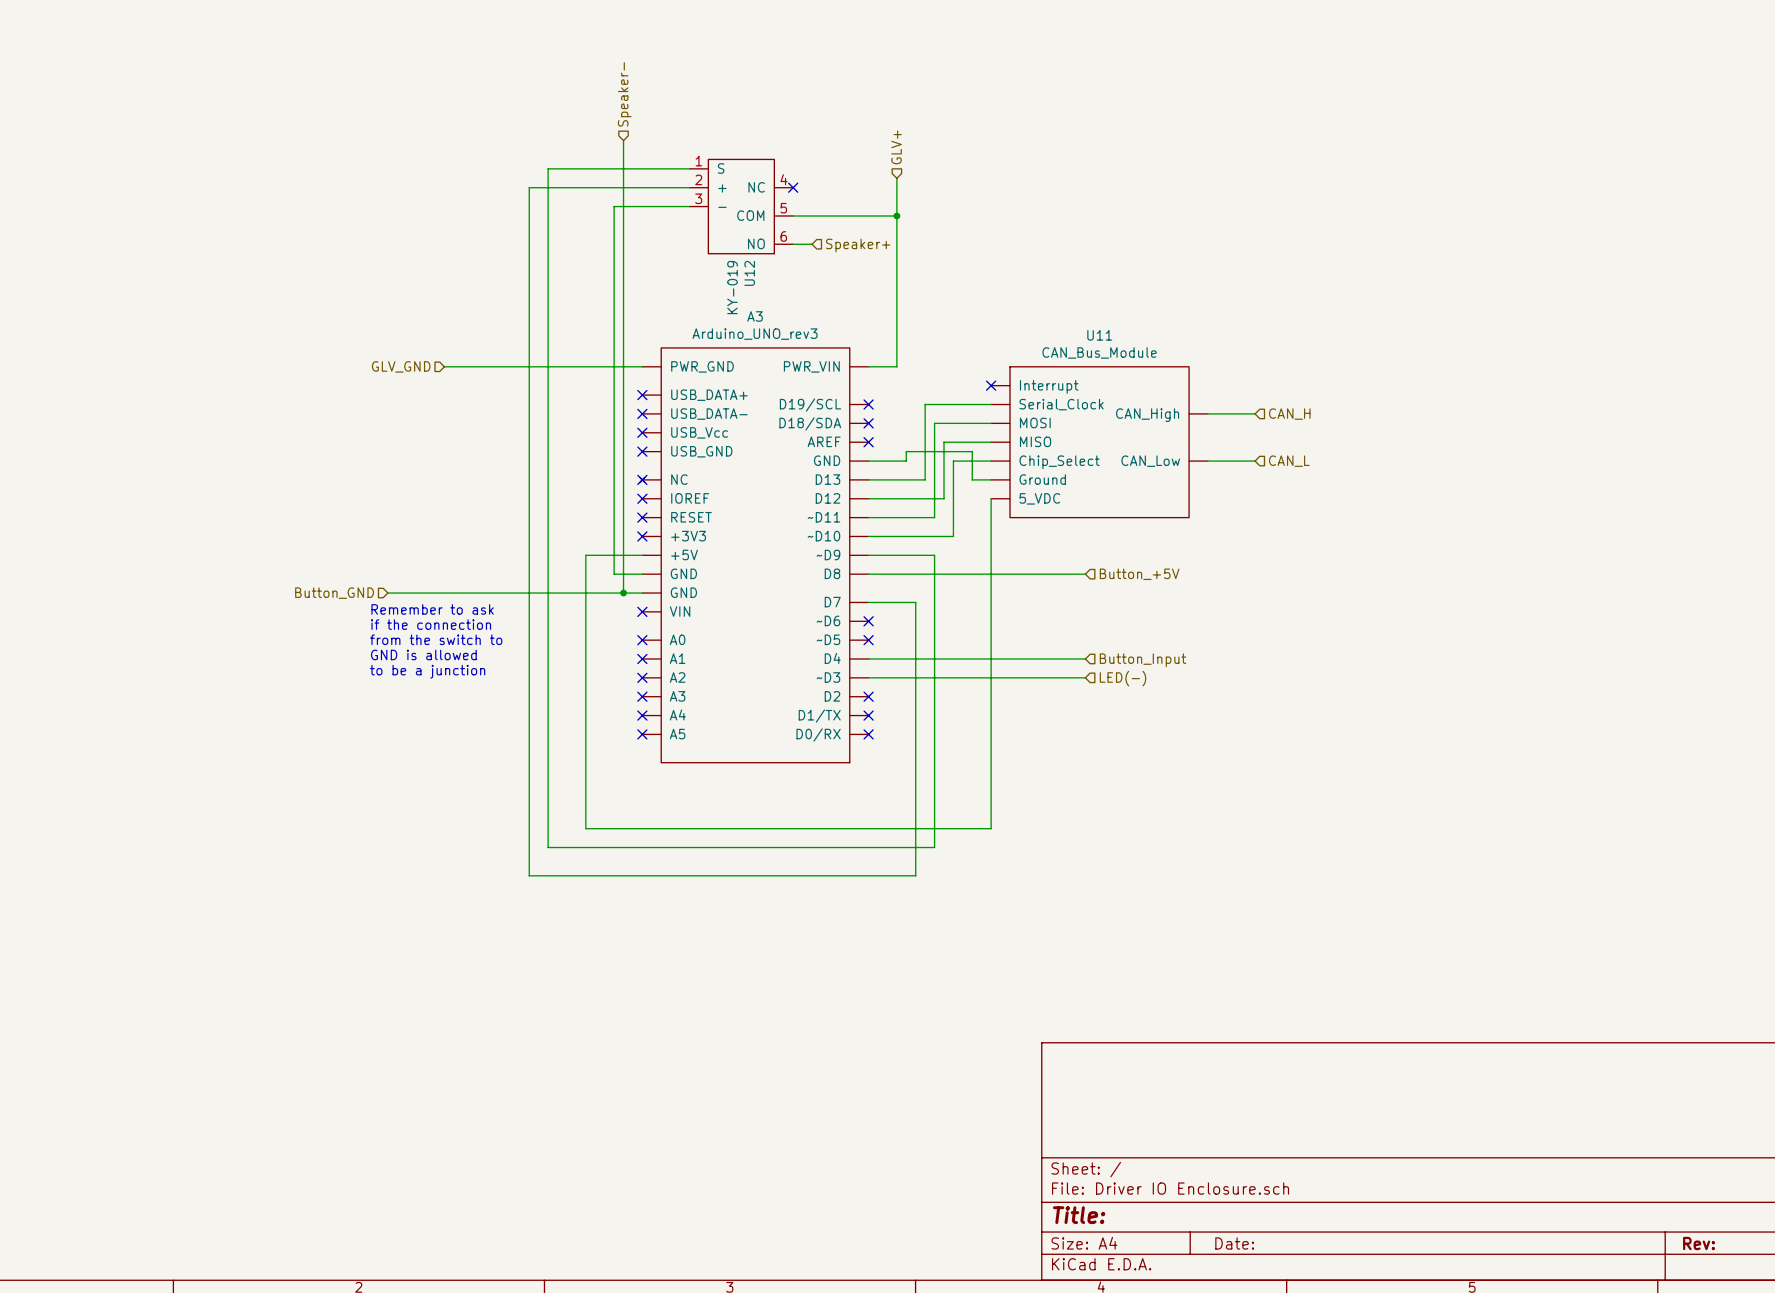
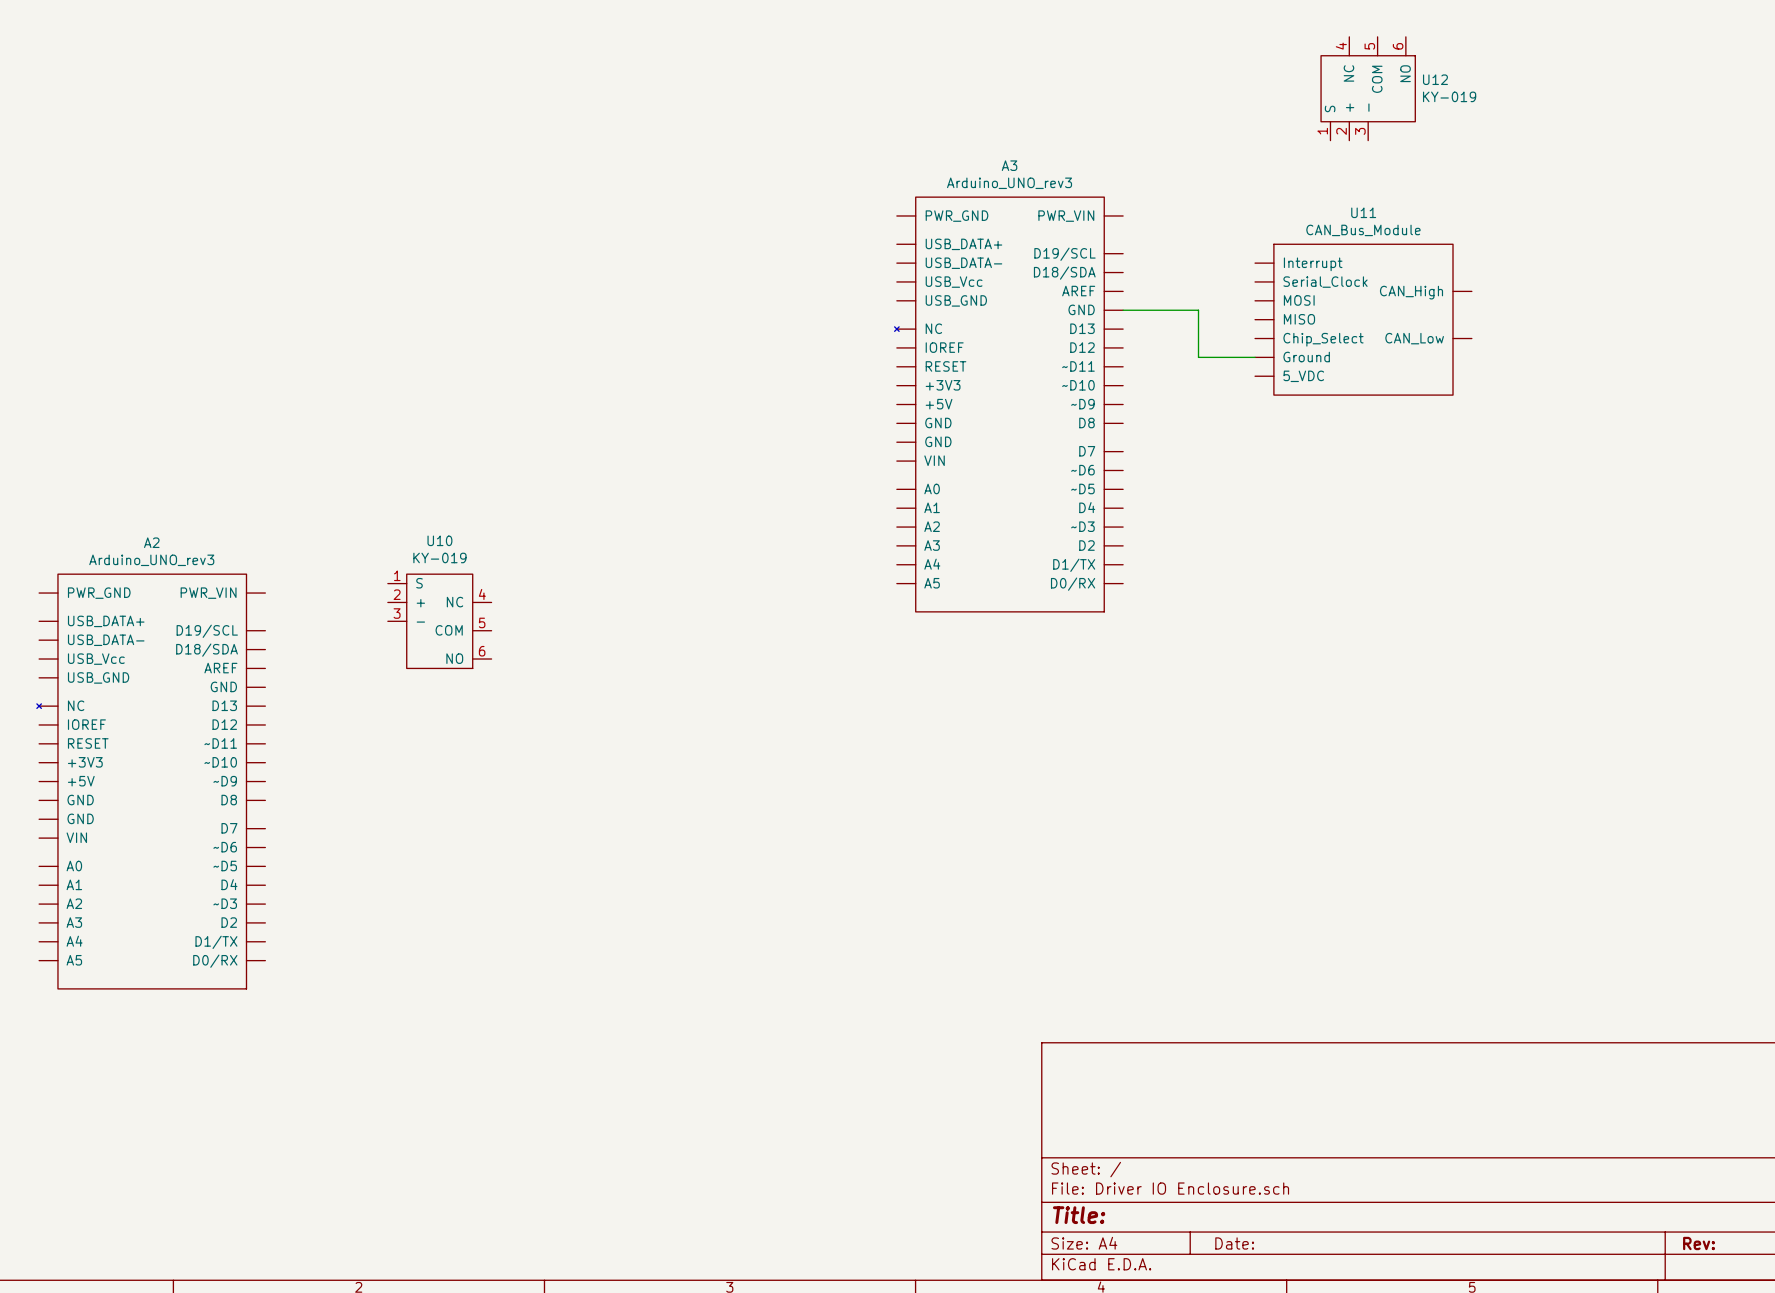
hierarchical label: Speaker- (624, 94) -> none
wire: (623, 140) (623, 593) -> none
hierarchical label: GLV+ (896, 147) -> none
wire: (689, 168) (548, 168) (548, 847) (934, 847) (934, 555) (868, 555) -> none
wire: (896, 178) (896, 366) (868, 366) -> none
wire: (689, 187) (529, 187) (529, 875) (915, 875) (915, 602) (868, 602) -> none
no-connect mark: (793, 187) -> none
wire: (689, 206) (614, 206) (614, 574) (642, 574) -> none
U12 rotation: 0° (741, 206) -> 90° counterclockwise (1368, 88)
U12 position: (741, 206) -> (1368, 88)
wire: (793, 215) (896, 215) -> none
junction: (896, 215) -> none
wire: (793, 244) (812, 244) -> none
hierarchical label: Speaker+ (858, 245) -> none
wire: none -> (1123, 310) (1198, 310) (1198, 357) (1255, 357)
hierarchical label: GLV_GND (401, 366) -> none
wire: (444, 366) (642, 366) -> none
no-connect mark: (991, 385) -> none
no-connect mark: (642, 395) -> none
no-connect mark: (868, 404) -> none
wire: (991, 404) (925, 404) (925, 479) (868, 479) -> none
no-connect mark: (642, 413) -> none
wire: (1207, 413) (1255, 413) -> none
hierarchical label: CAN_H (1289, 414) -> none
no-connect mark: (868, 423) -> none
wire: (991, 423) (934, 423) (934, 517) (868, 517) -> none
no-connect mark: (642, 432) -> none
no-connect mark: (868, 442) -> none
wire: (991, 442) (944, 442) (944, 498) (868, 498) -> none
U11 position: (1099, 442) -> (1363, 319)
no-connect mark: (642, 451) -> none
wire: (868, 461) (906, 461) (906, 451) (972, 451) (972, 479) (991, 479) -> none
wire: (991, 461) (953, 461) (953, 536) (868, 536) -> none
wire: (1207, 461) (1255, 461) -> none
hierarchical label: CAN_L (1289, 461) -> none
no-connect mark: (642, 479) -> none
no-connect mark: (642, 498) -> none
wire: (991, 498) (991, 828) (585, 828) (585, 555) (642, 555) -> none
no-connect mark: (642, 517) -> none
no-connect mark: (642, 536) -> none
A3 position: (754, 555) -> (1008, 404)
wire: (868, 574) (1085, 574) -> none
hierarchical label: Button_+5V (1139, 574) -> none
hierarchical label: Button_GND (334, 593) -> none
wire: (387, 593) (642, 593) -> none
junction: (623, 593) -> none
text: Remember to ask (432, 609) -> none
no-connect mark: (642, 611) -> none
U10: none -> KY-019 (439, 621)
no-connect mark: (868, 621) -> none
text: if the connection (431, 624) -> none
text: from the switch to (436, 639) -> none
no-connect mark: (642, 640) -> none
no-connect mark: (868, 640) -> none
text: GND is allowed (423, 654) -> none
no-connect mark: (642, 659) -> none
wire: (868, 659) (1085, 659) -> none
hierarchical label: Button_Input (1142, 660) -> none
text: to be a junction (427, 671) -> none
no-connect mark: (642, 677) -> none
wire: (868, 677) (1085, 677) -> none
hierarchical label: LED(-) (1123, 678) -> none
no-connect mark: (642, 696) -> none
no-connect mark: (868, 696) -> none
no-connect mark: (642, 715) -> none
no-connect mark: (868, 715) -> none
no-connect mark: (642, 734) -> none
no-connect mark: (868, 734) -> none
A2: none -> Arduino_UNO_rev3 (151, 781)

